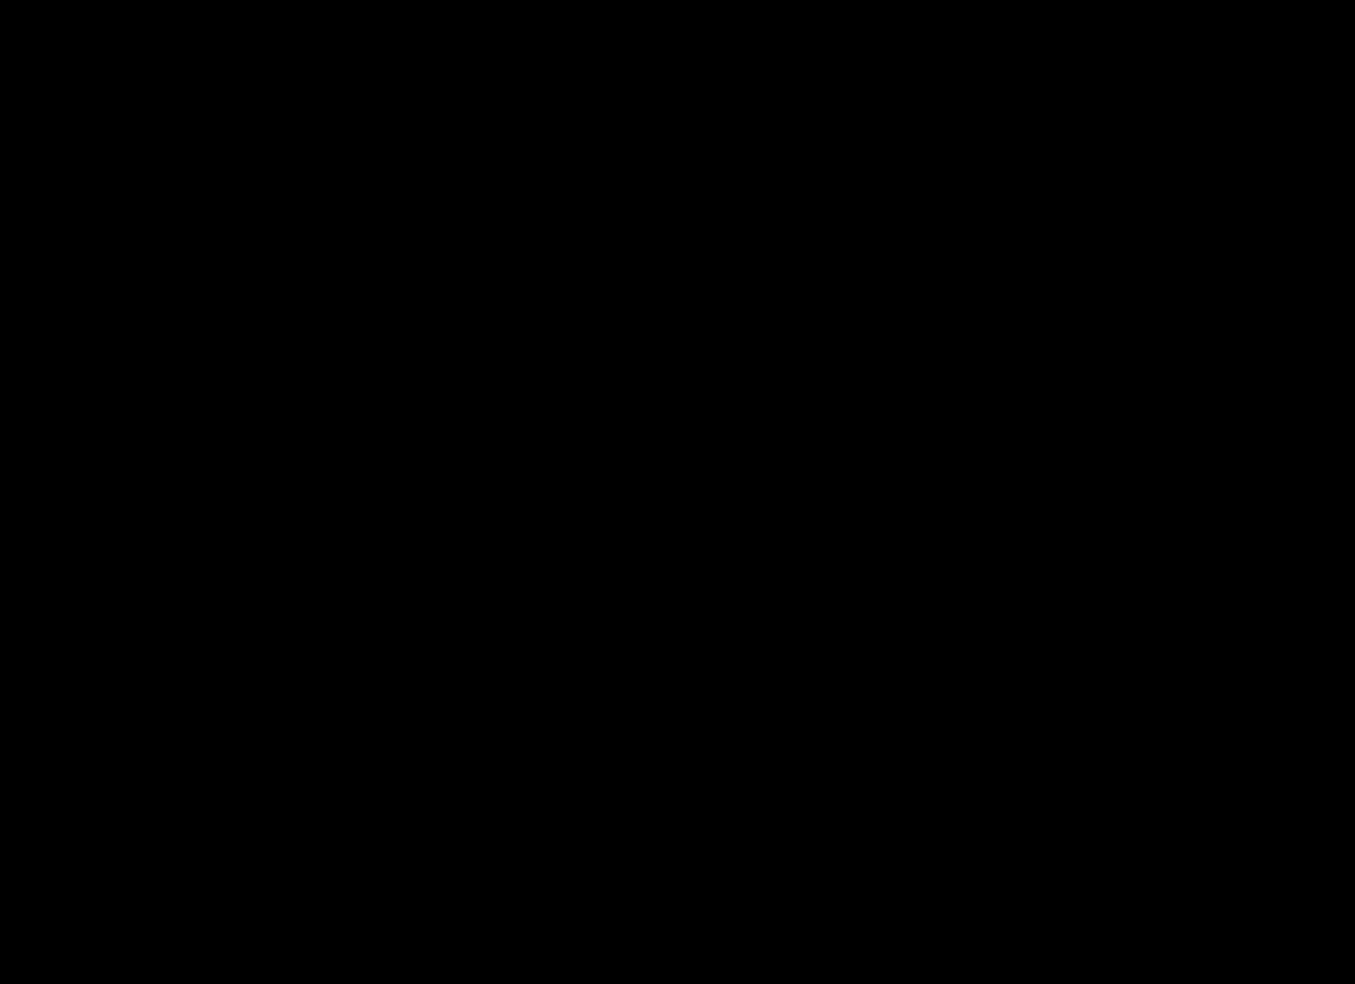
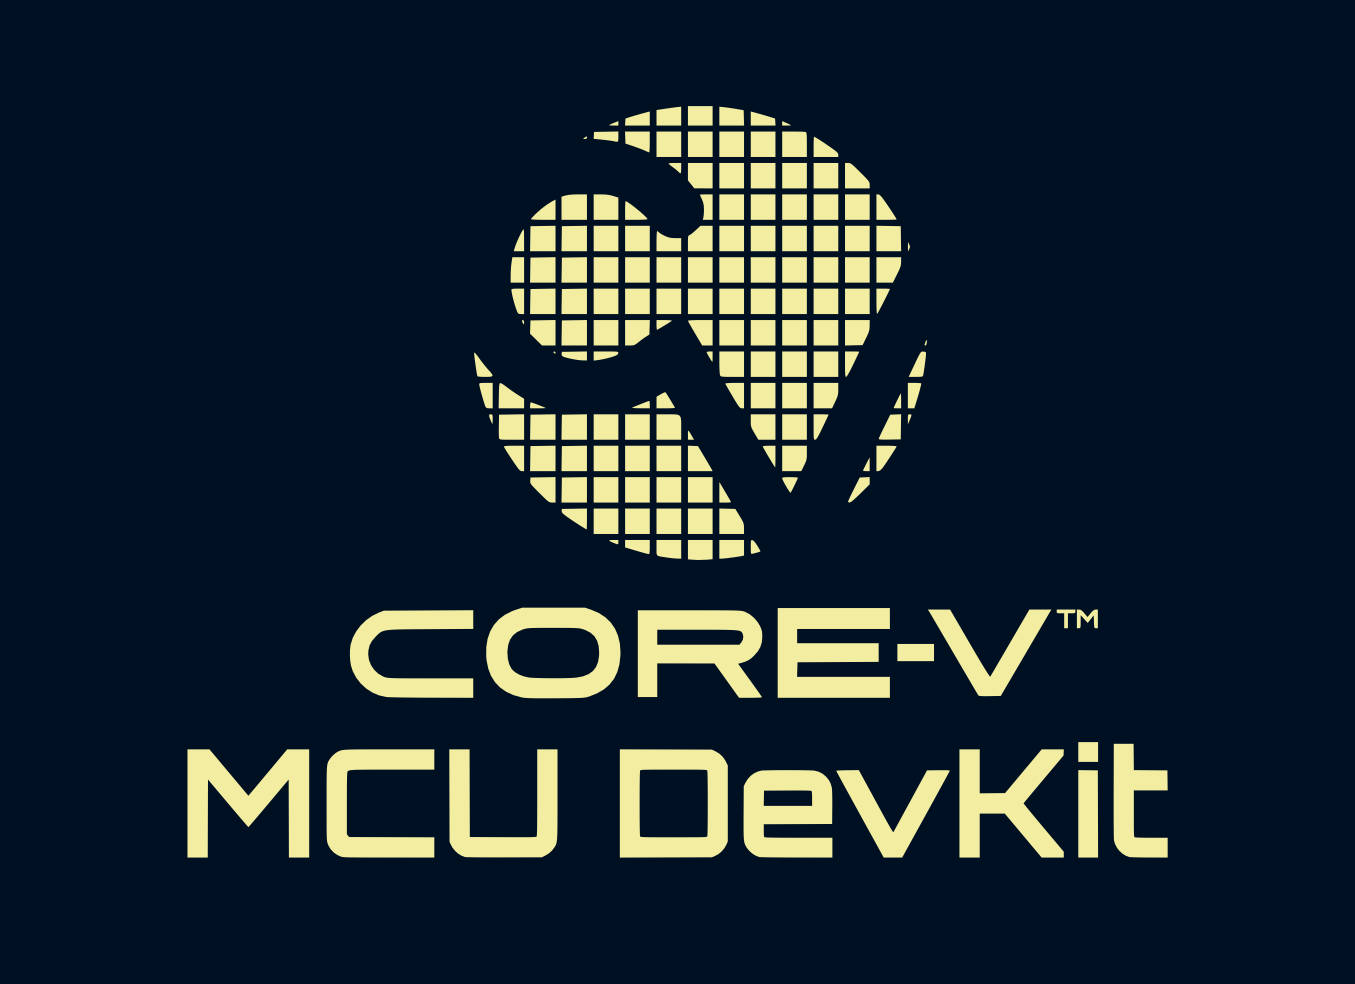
drawing: none -> [187, 106, 1168, 858]

